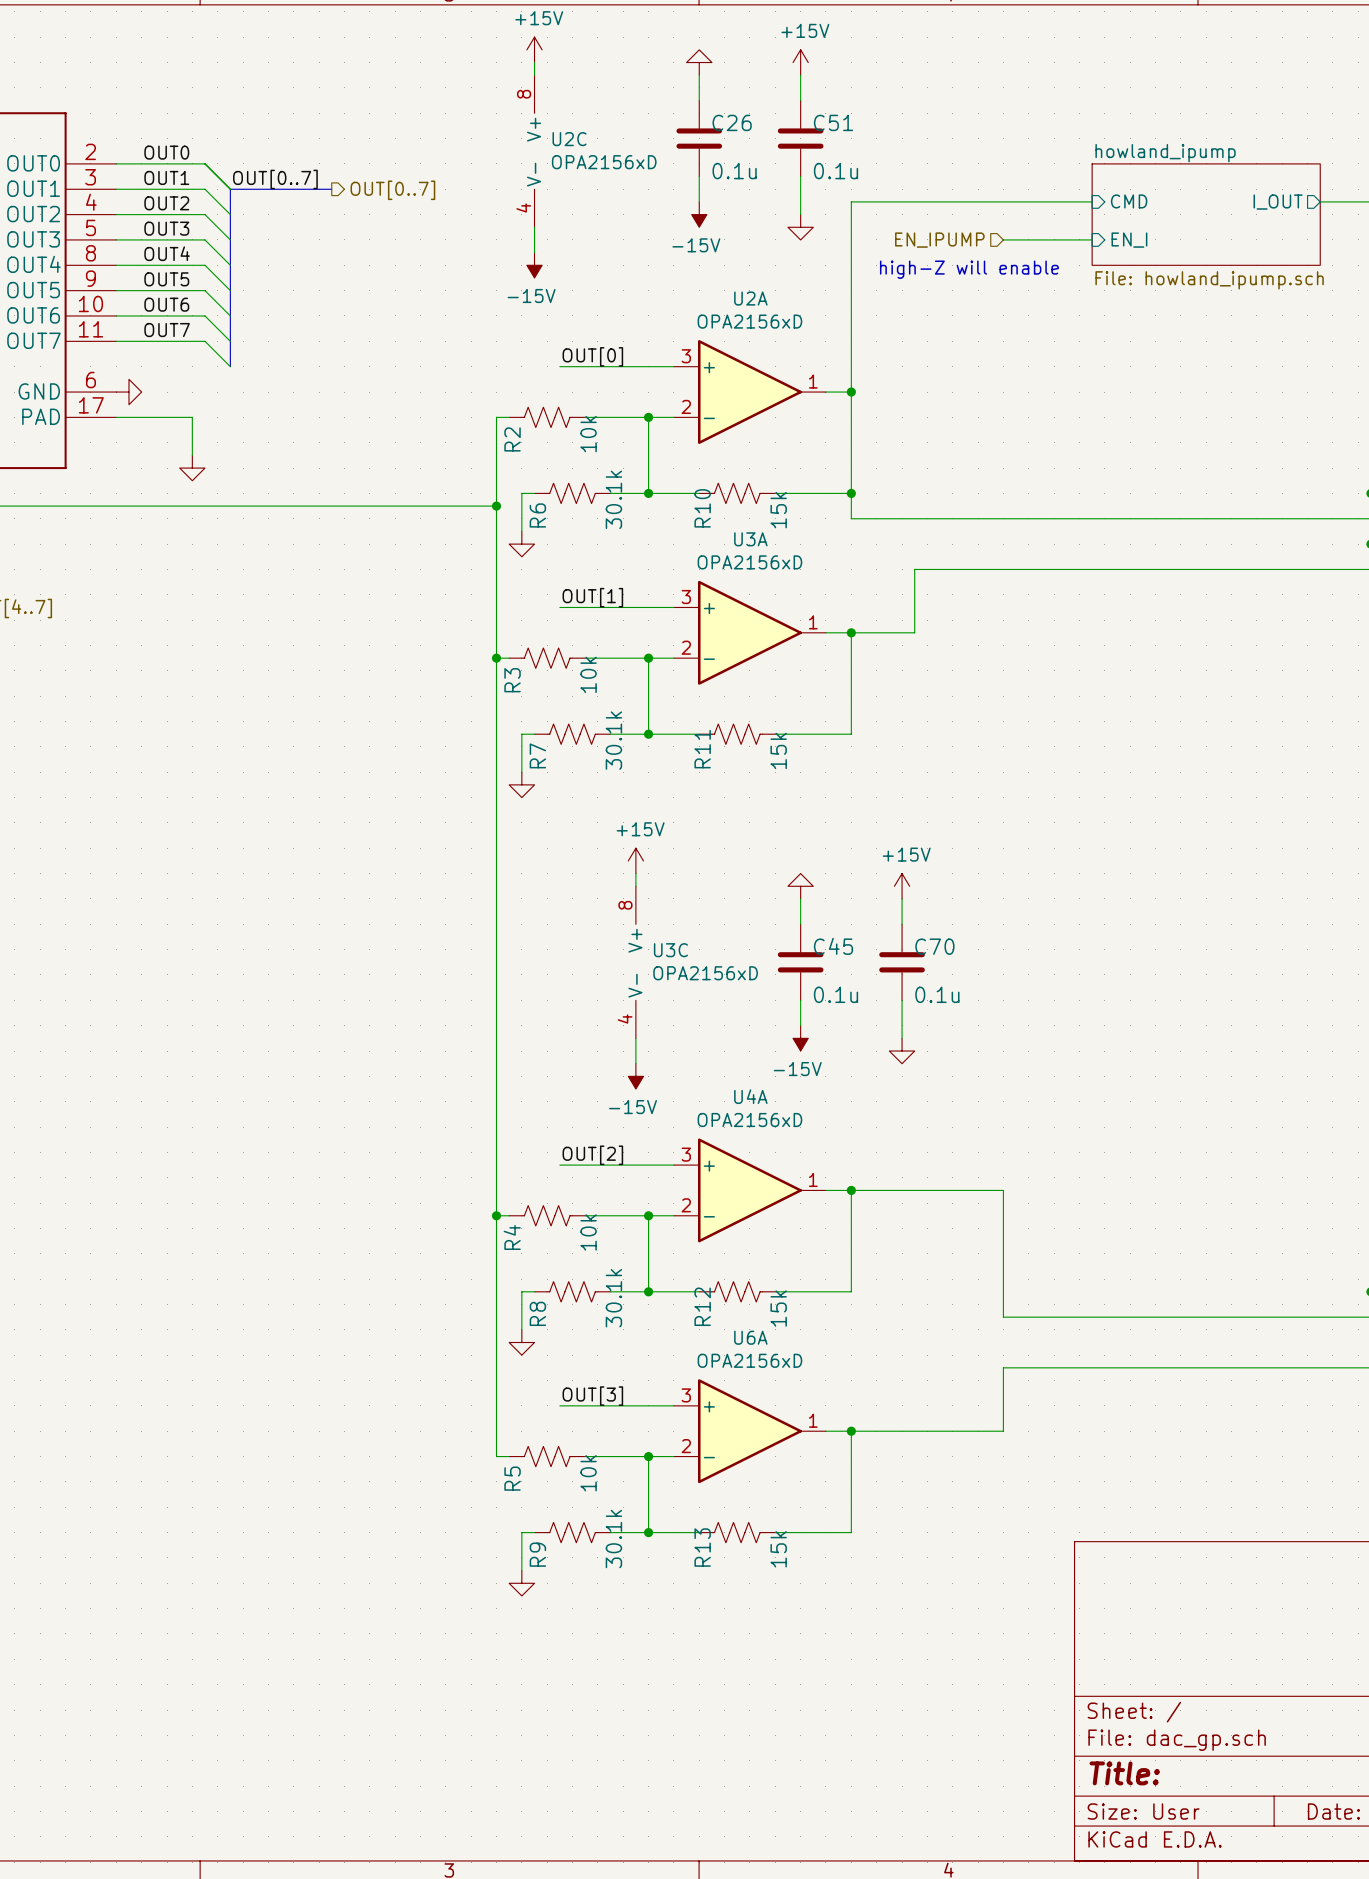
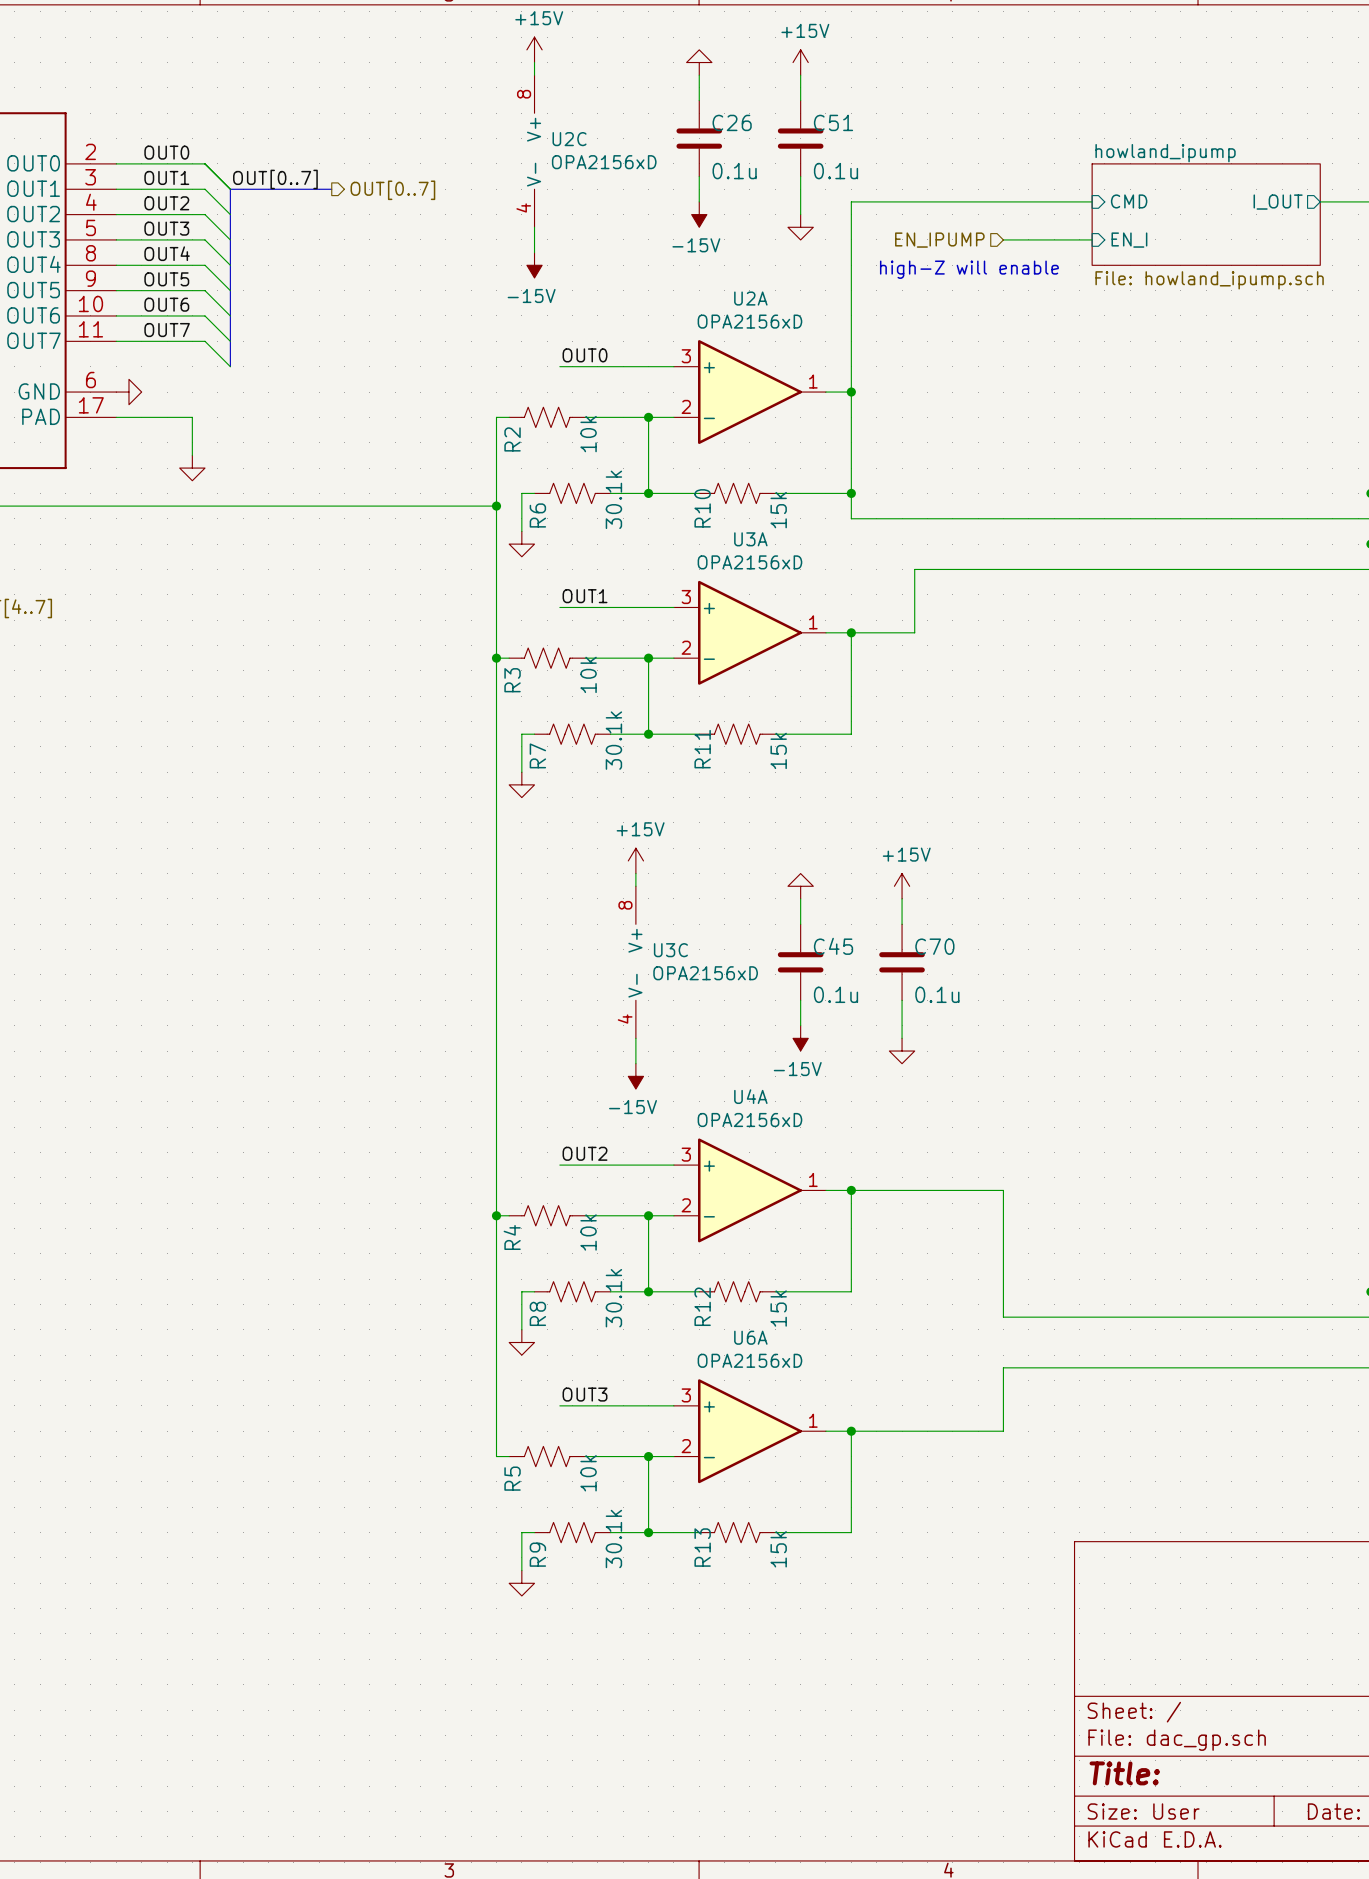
label: OUT[0] (592, 356) -> OUT0 (585, 355)
label: OUT[1] (592, 597) -> OUT1 (585, 596)
label: OUT[2] (592, 1155) -> OUT2 (585, 1153)
label: OUT[3] (592, 1396) -> OUT3 (585, 1394)

